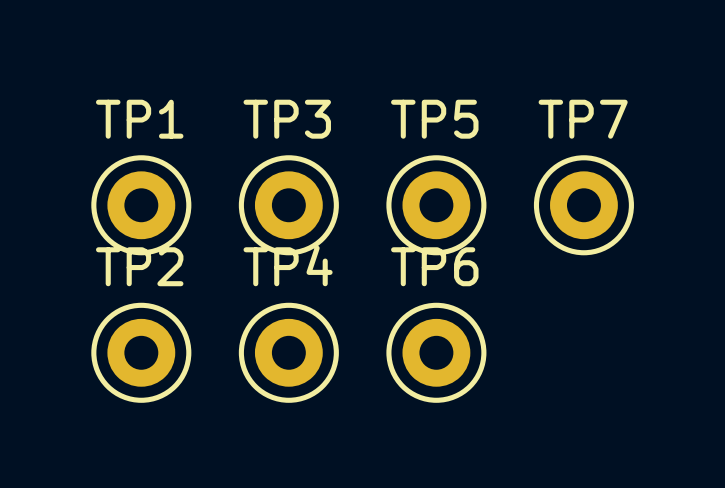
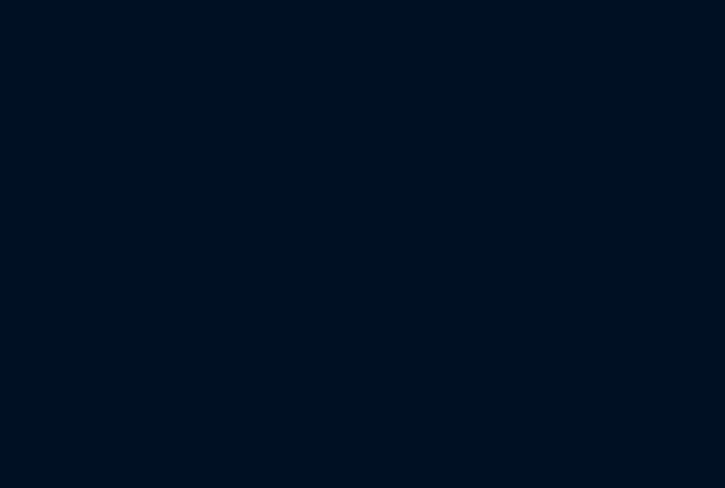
TP1: (141, 205) -> none
TP3: (288, 205) -> none
TP5: (436, 205) -> none
TP7: (583, 205) -> none
TP2: (141, 352) -> none
TP4: (288, 352) -> none
TP6: (436, 352) -> none

